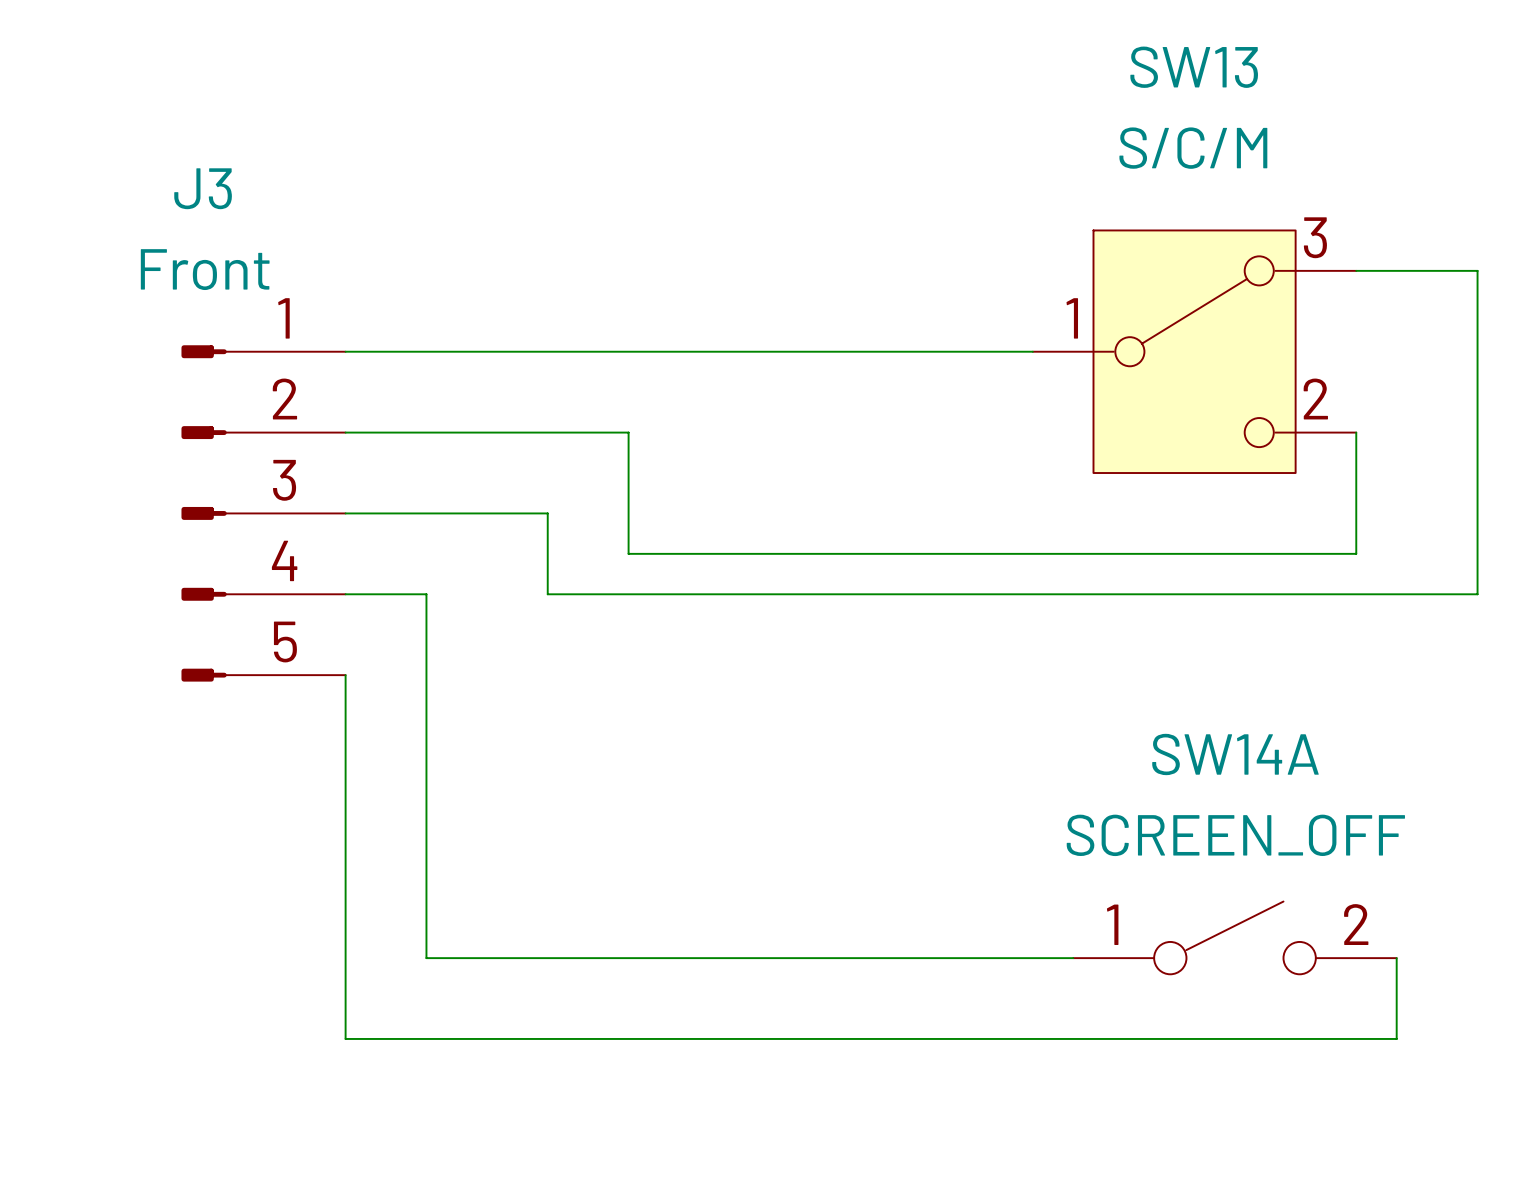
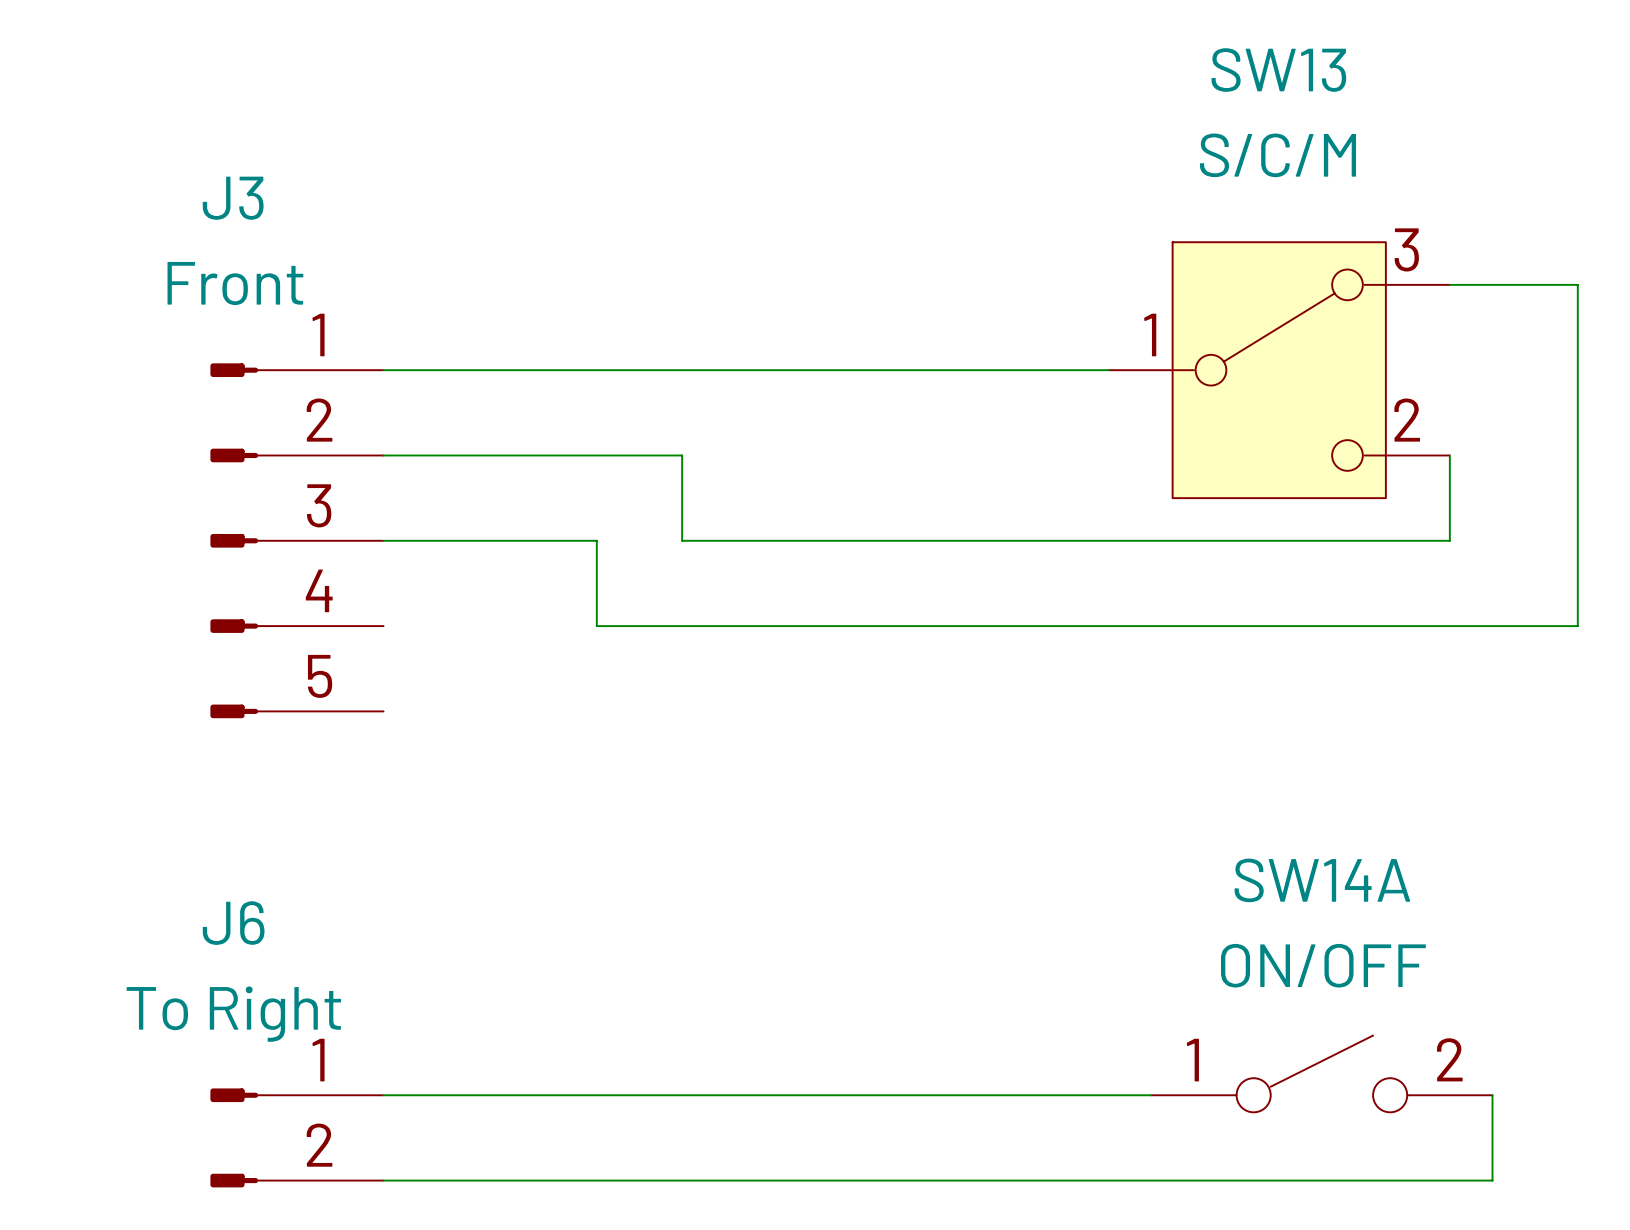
wire: (628, 513) (628, 553) (1356, 553) (1356, 513) -> (682, 540) (1449, 540)
wire: (345, 594) (426, 594) (426, 958) (1073, 958) -> none
wire: (345, 675) (345, 1038) -> none
SW14A value: SCREEN_OFF (1235, 835) -> ON/OFF (1323, 965)
SW14A position: (1234, 937) -> (1321, 1073)
wire: (1396, 958) (1396, 1038) (1073, 1038) -> none
wire: none -> (1492, 1095) (1492, 1180) (383, 1180)
J6: none -> To Right (296, 1137)

